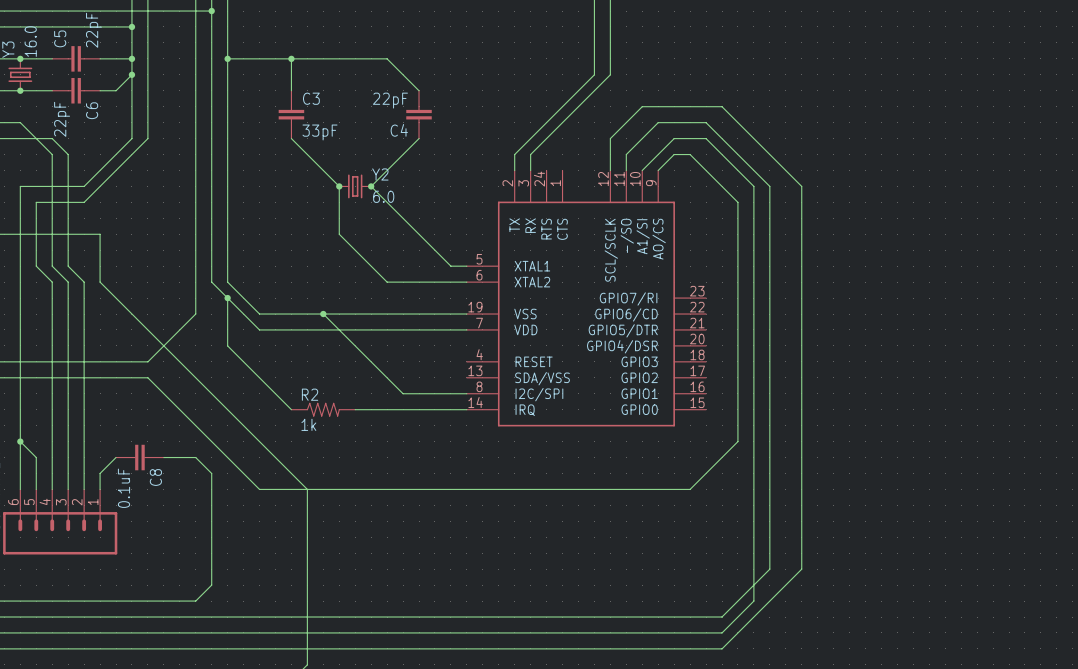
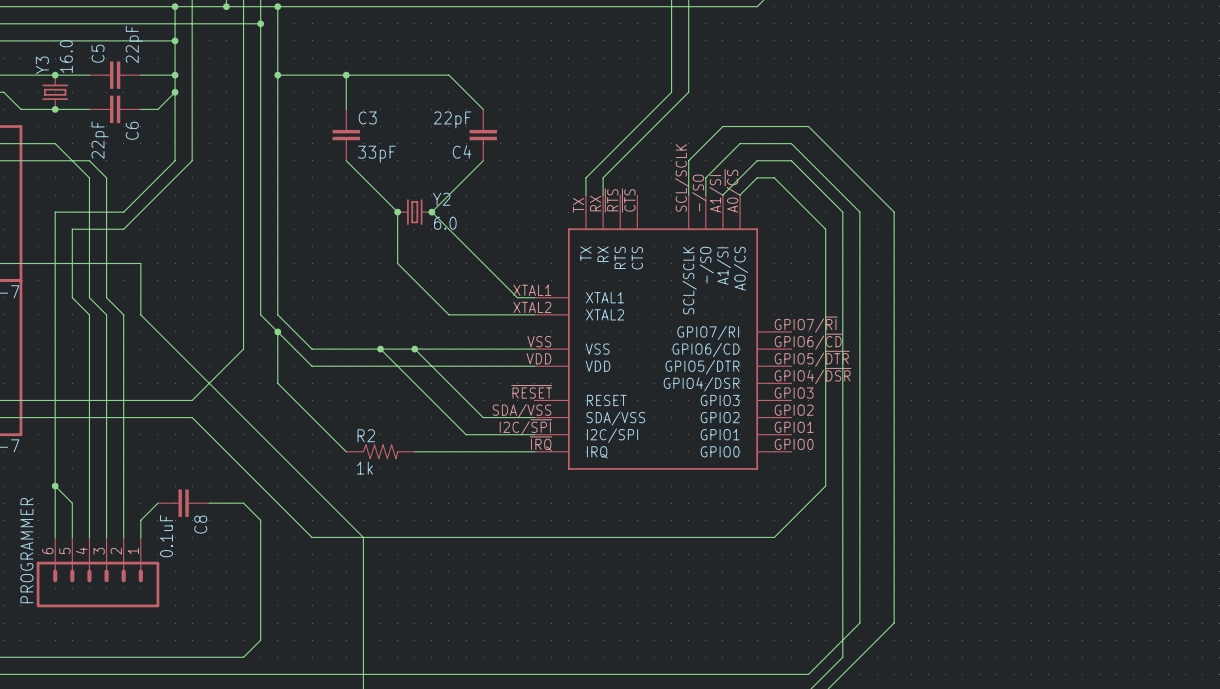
part symbol: [466, 170, 707, 427] -> [534, 195, 792, 470]
wire: none -> (414, 349) (483, 417) (534, 417)
junction: none -> (414, 349)

